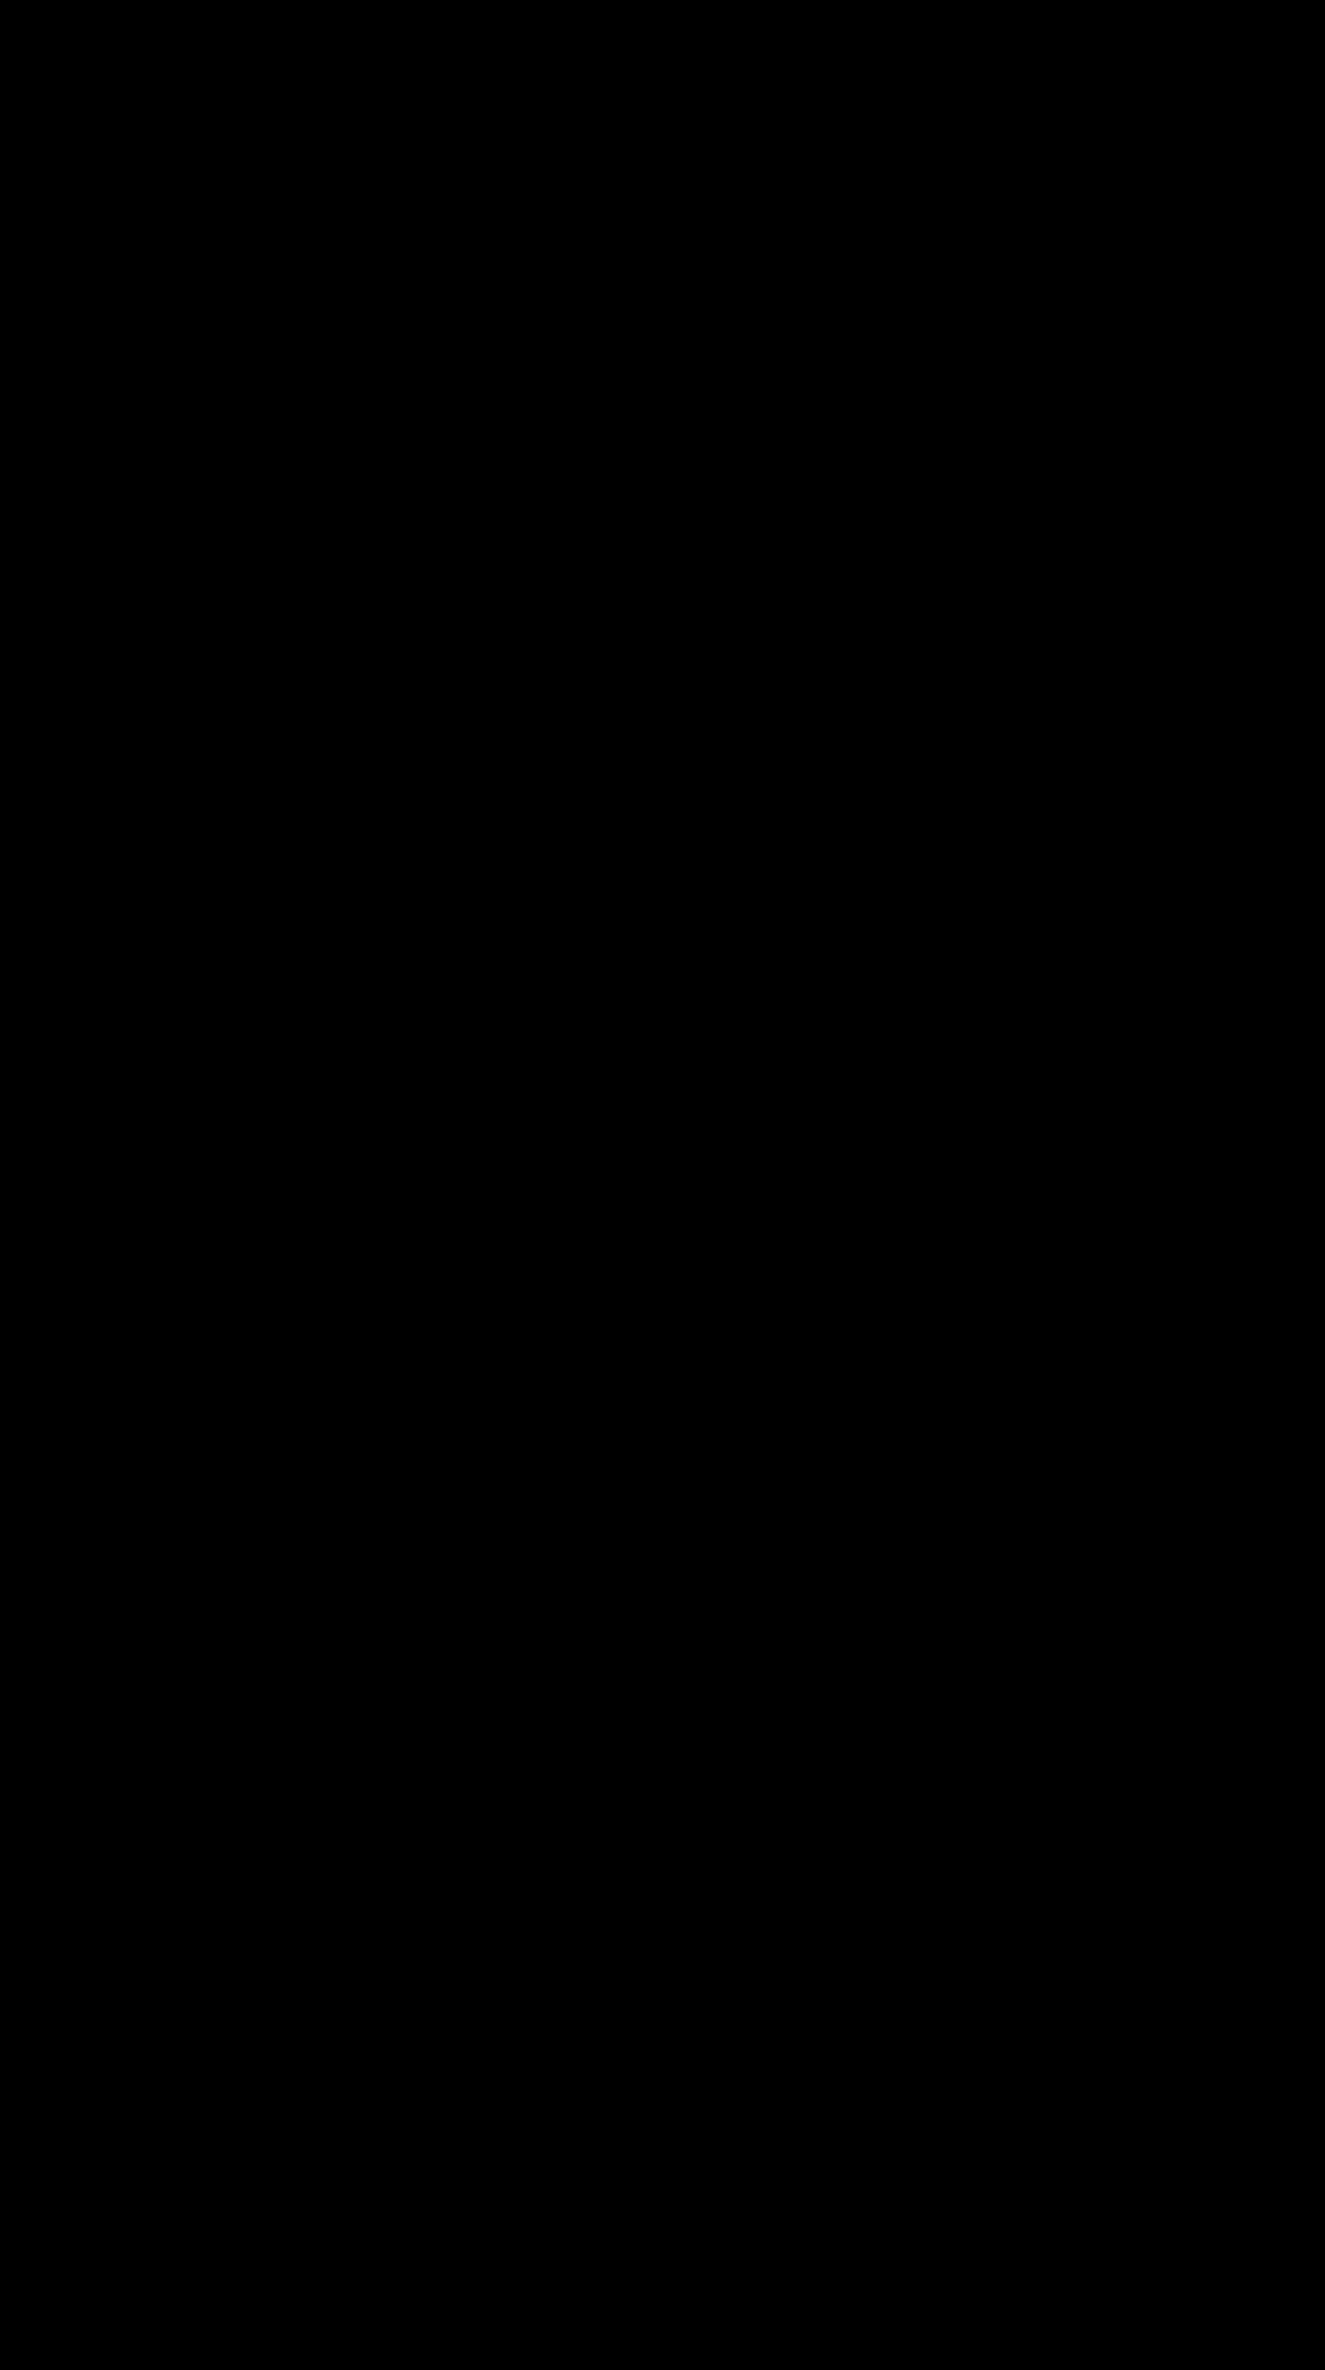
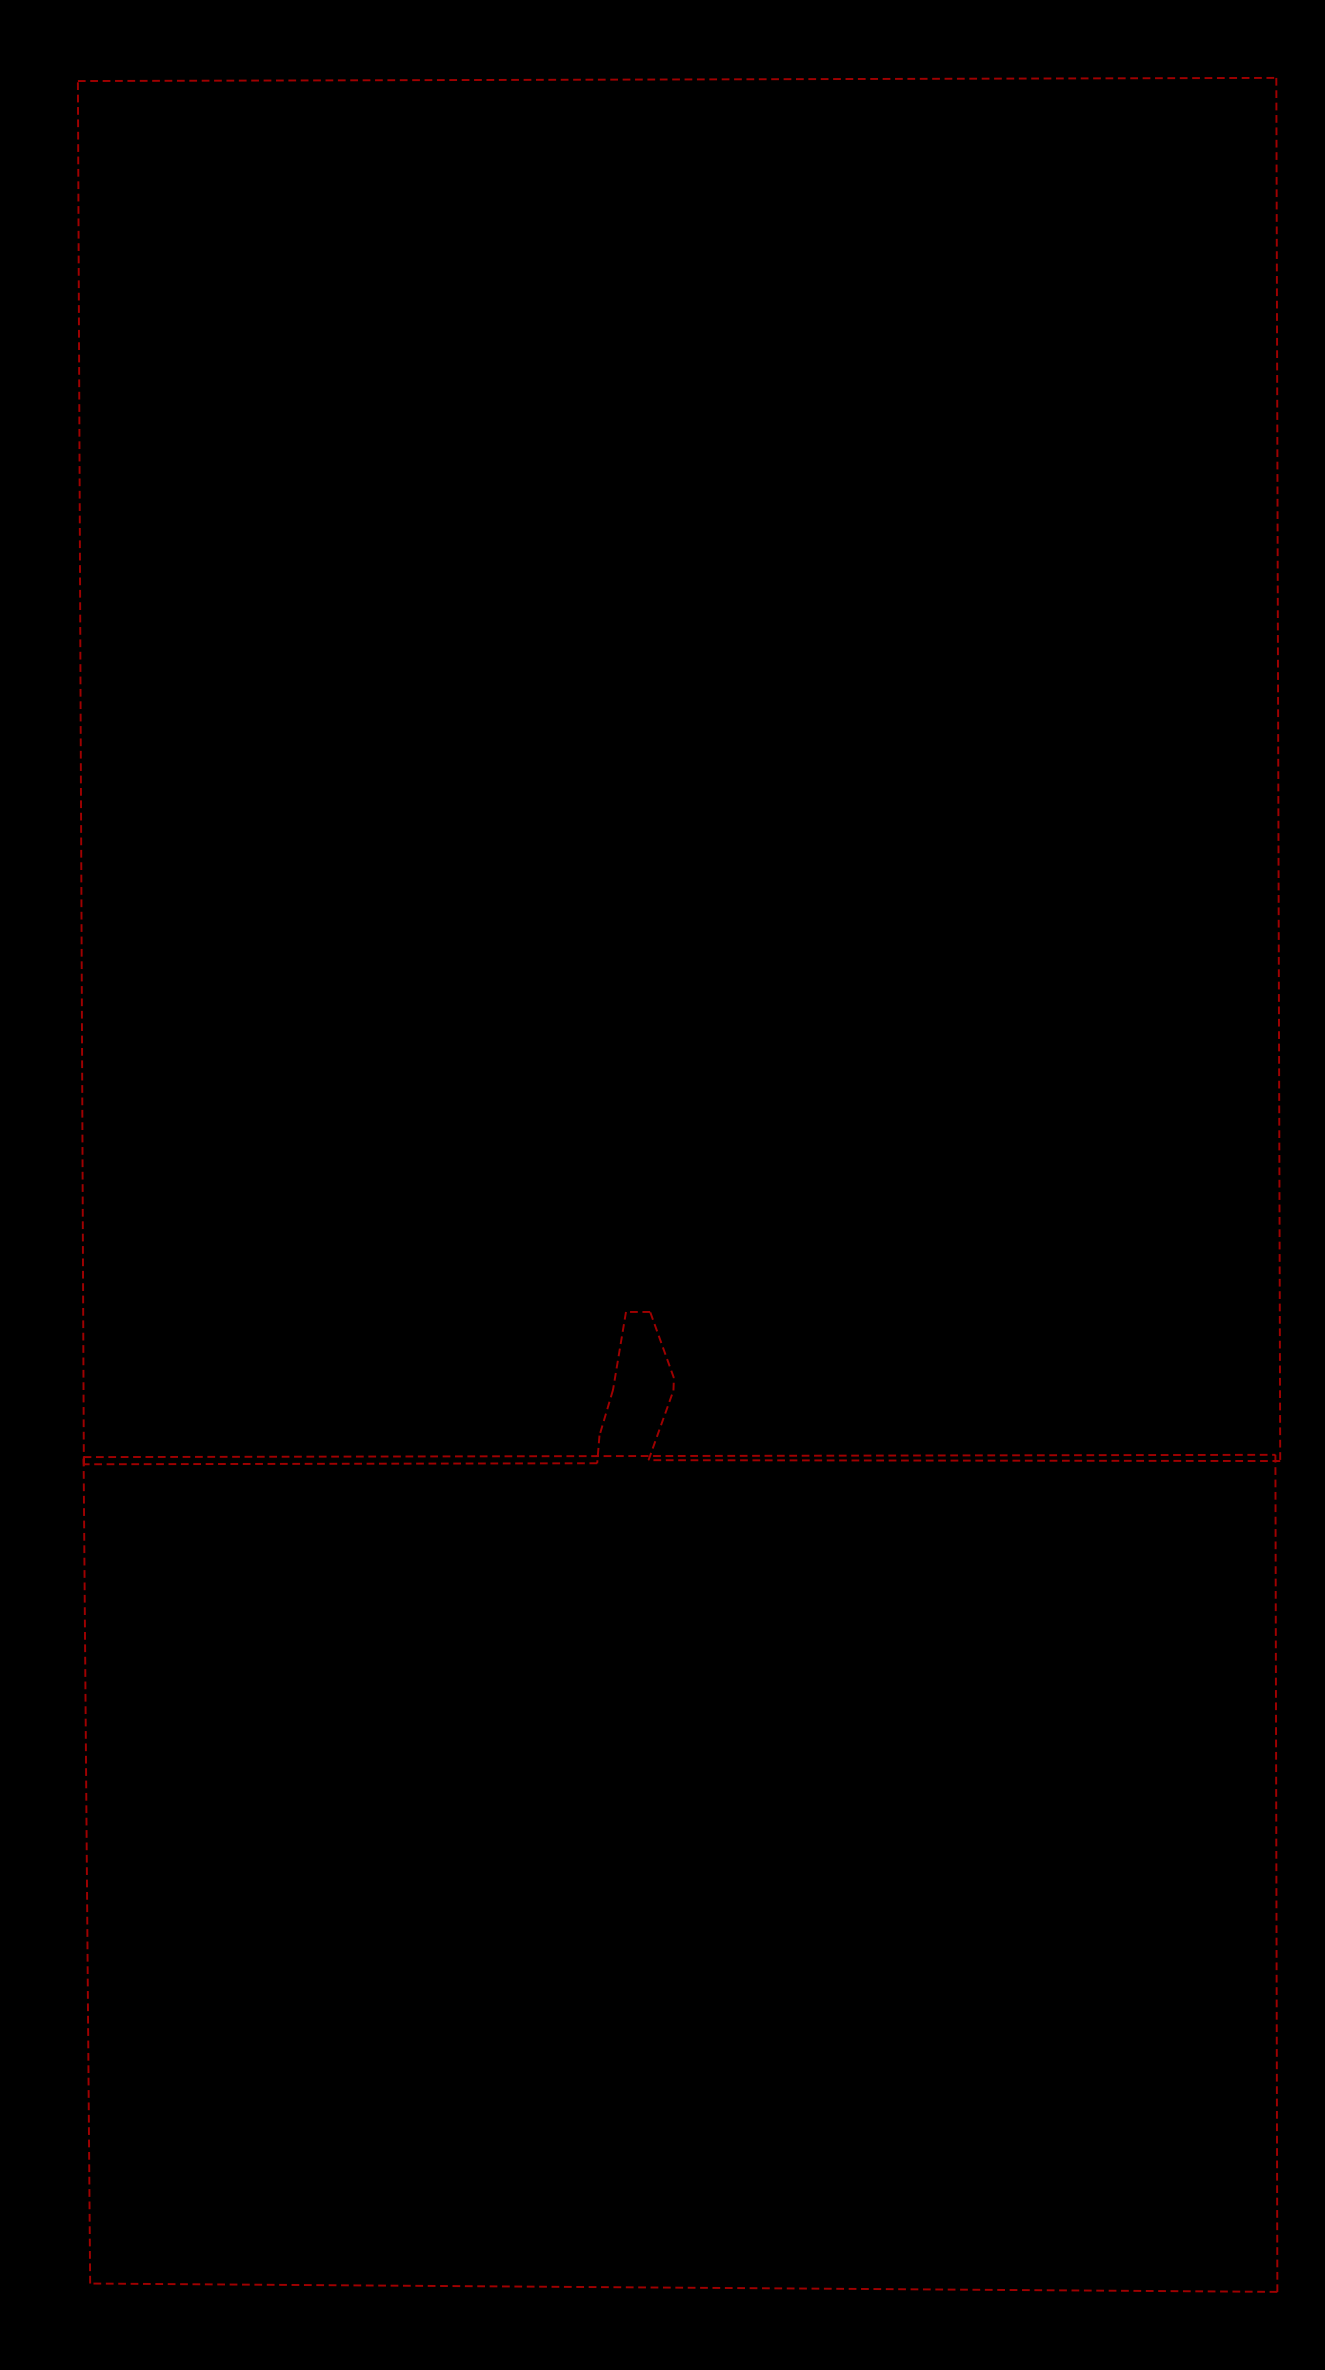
zone outline: none -> (1276, 77) (77, 81) (83, 1464) (597, 1463) (599, 1435) (613, 1389) (625, 1311) (650, 1311) (673, 1377) (673, 1390) (648, 1460) (1280, 1461) (1276, 77)
zone outline: none -> (1275, 1454) (83, 1457) (90, 2283) (1277, 2291) (1275, 1454)

